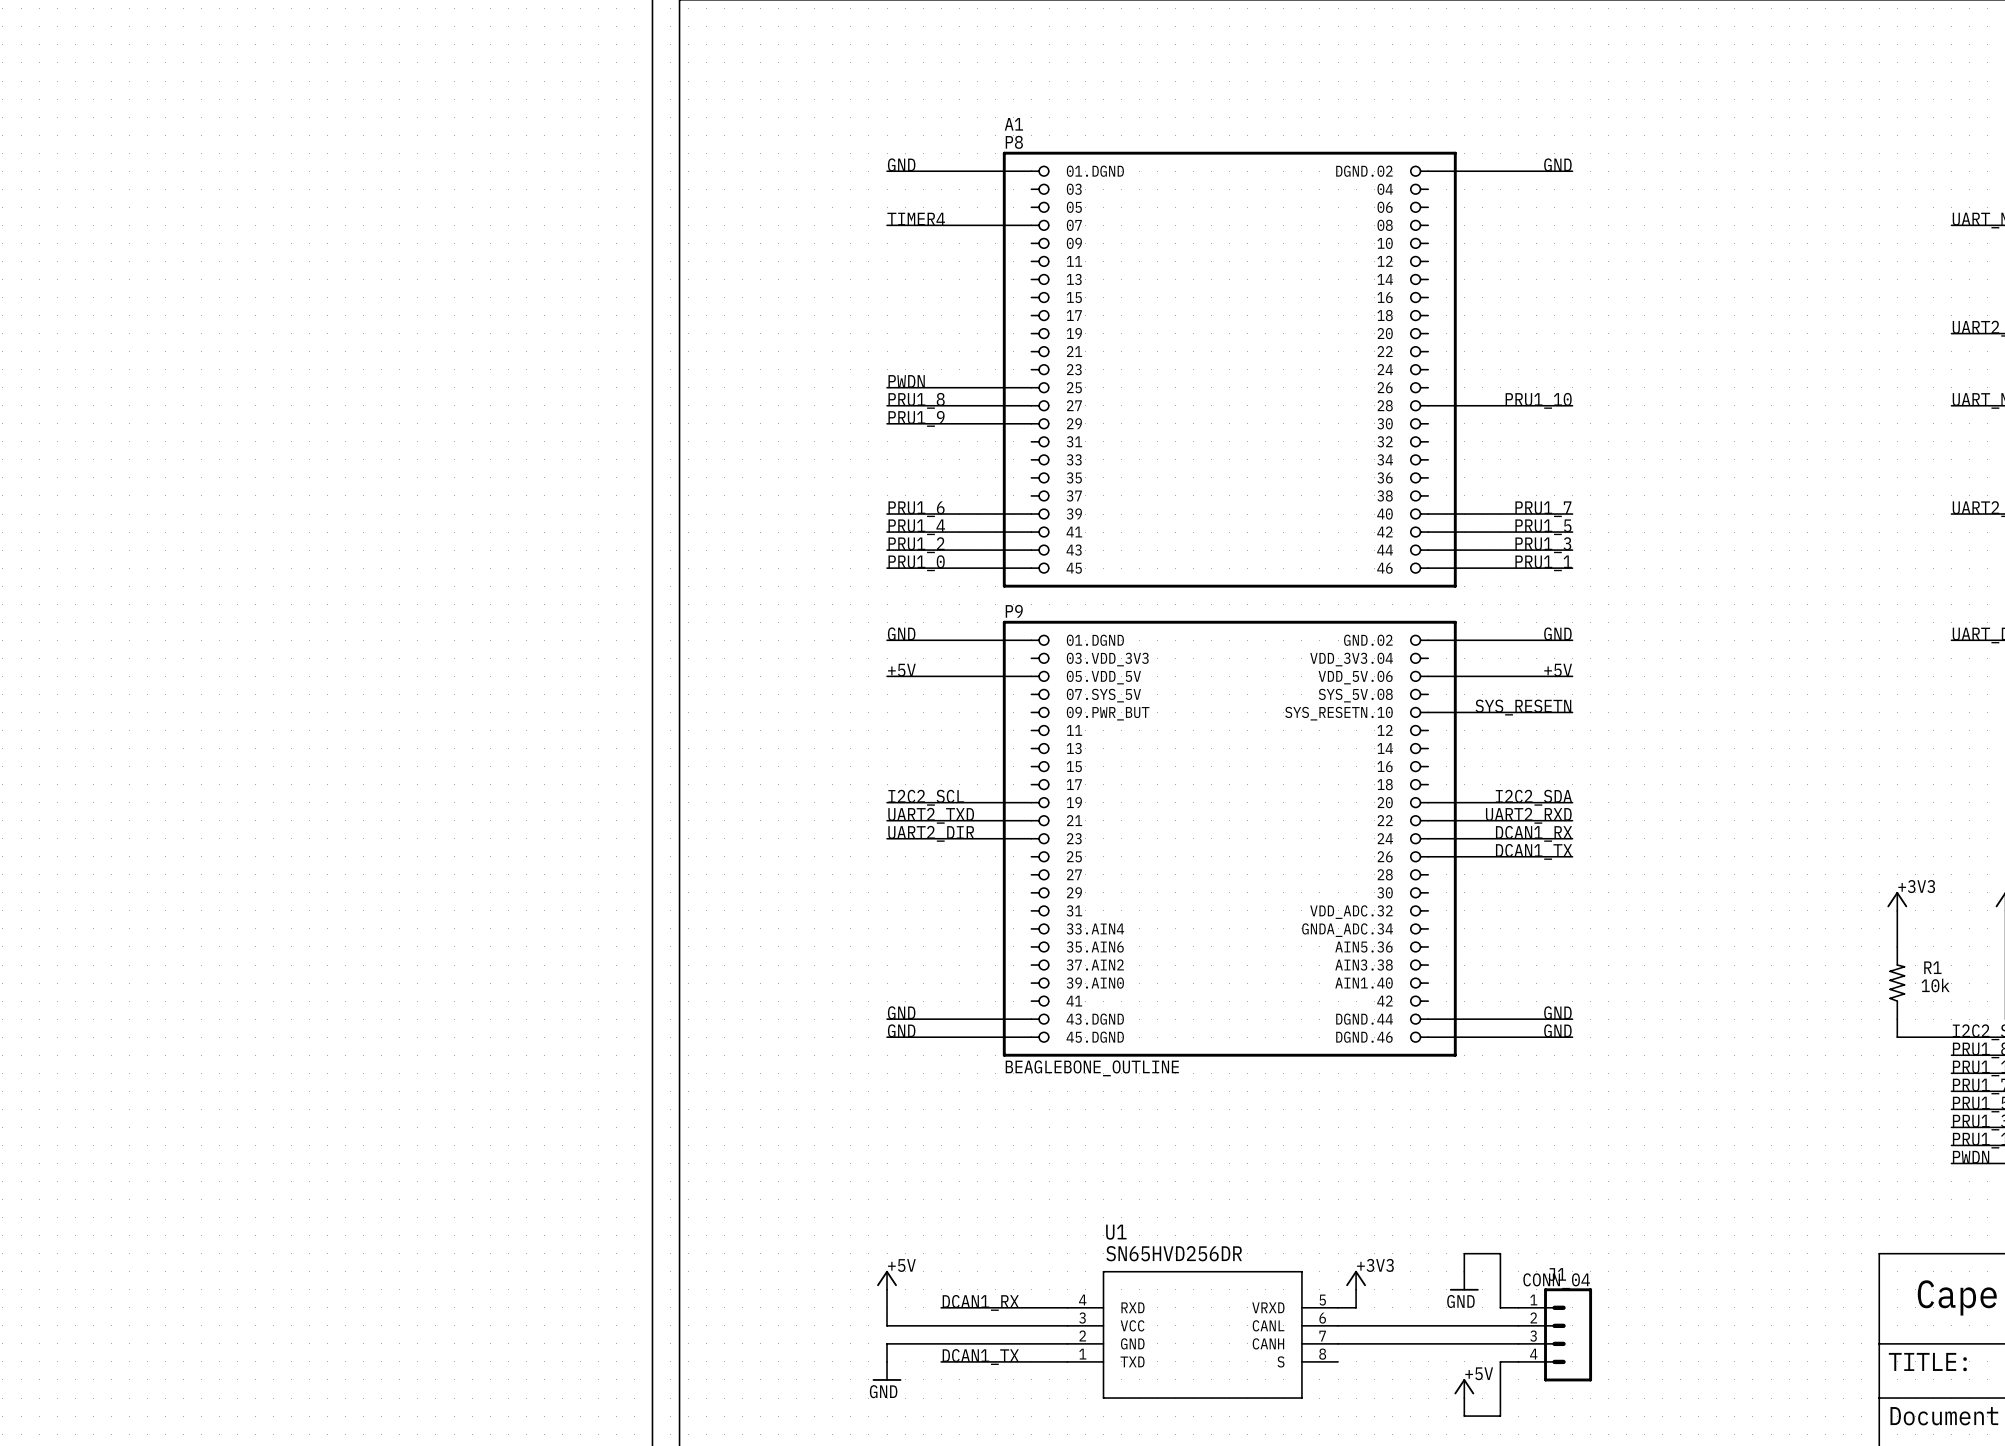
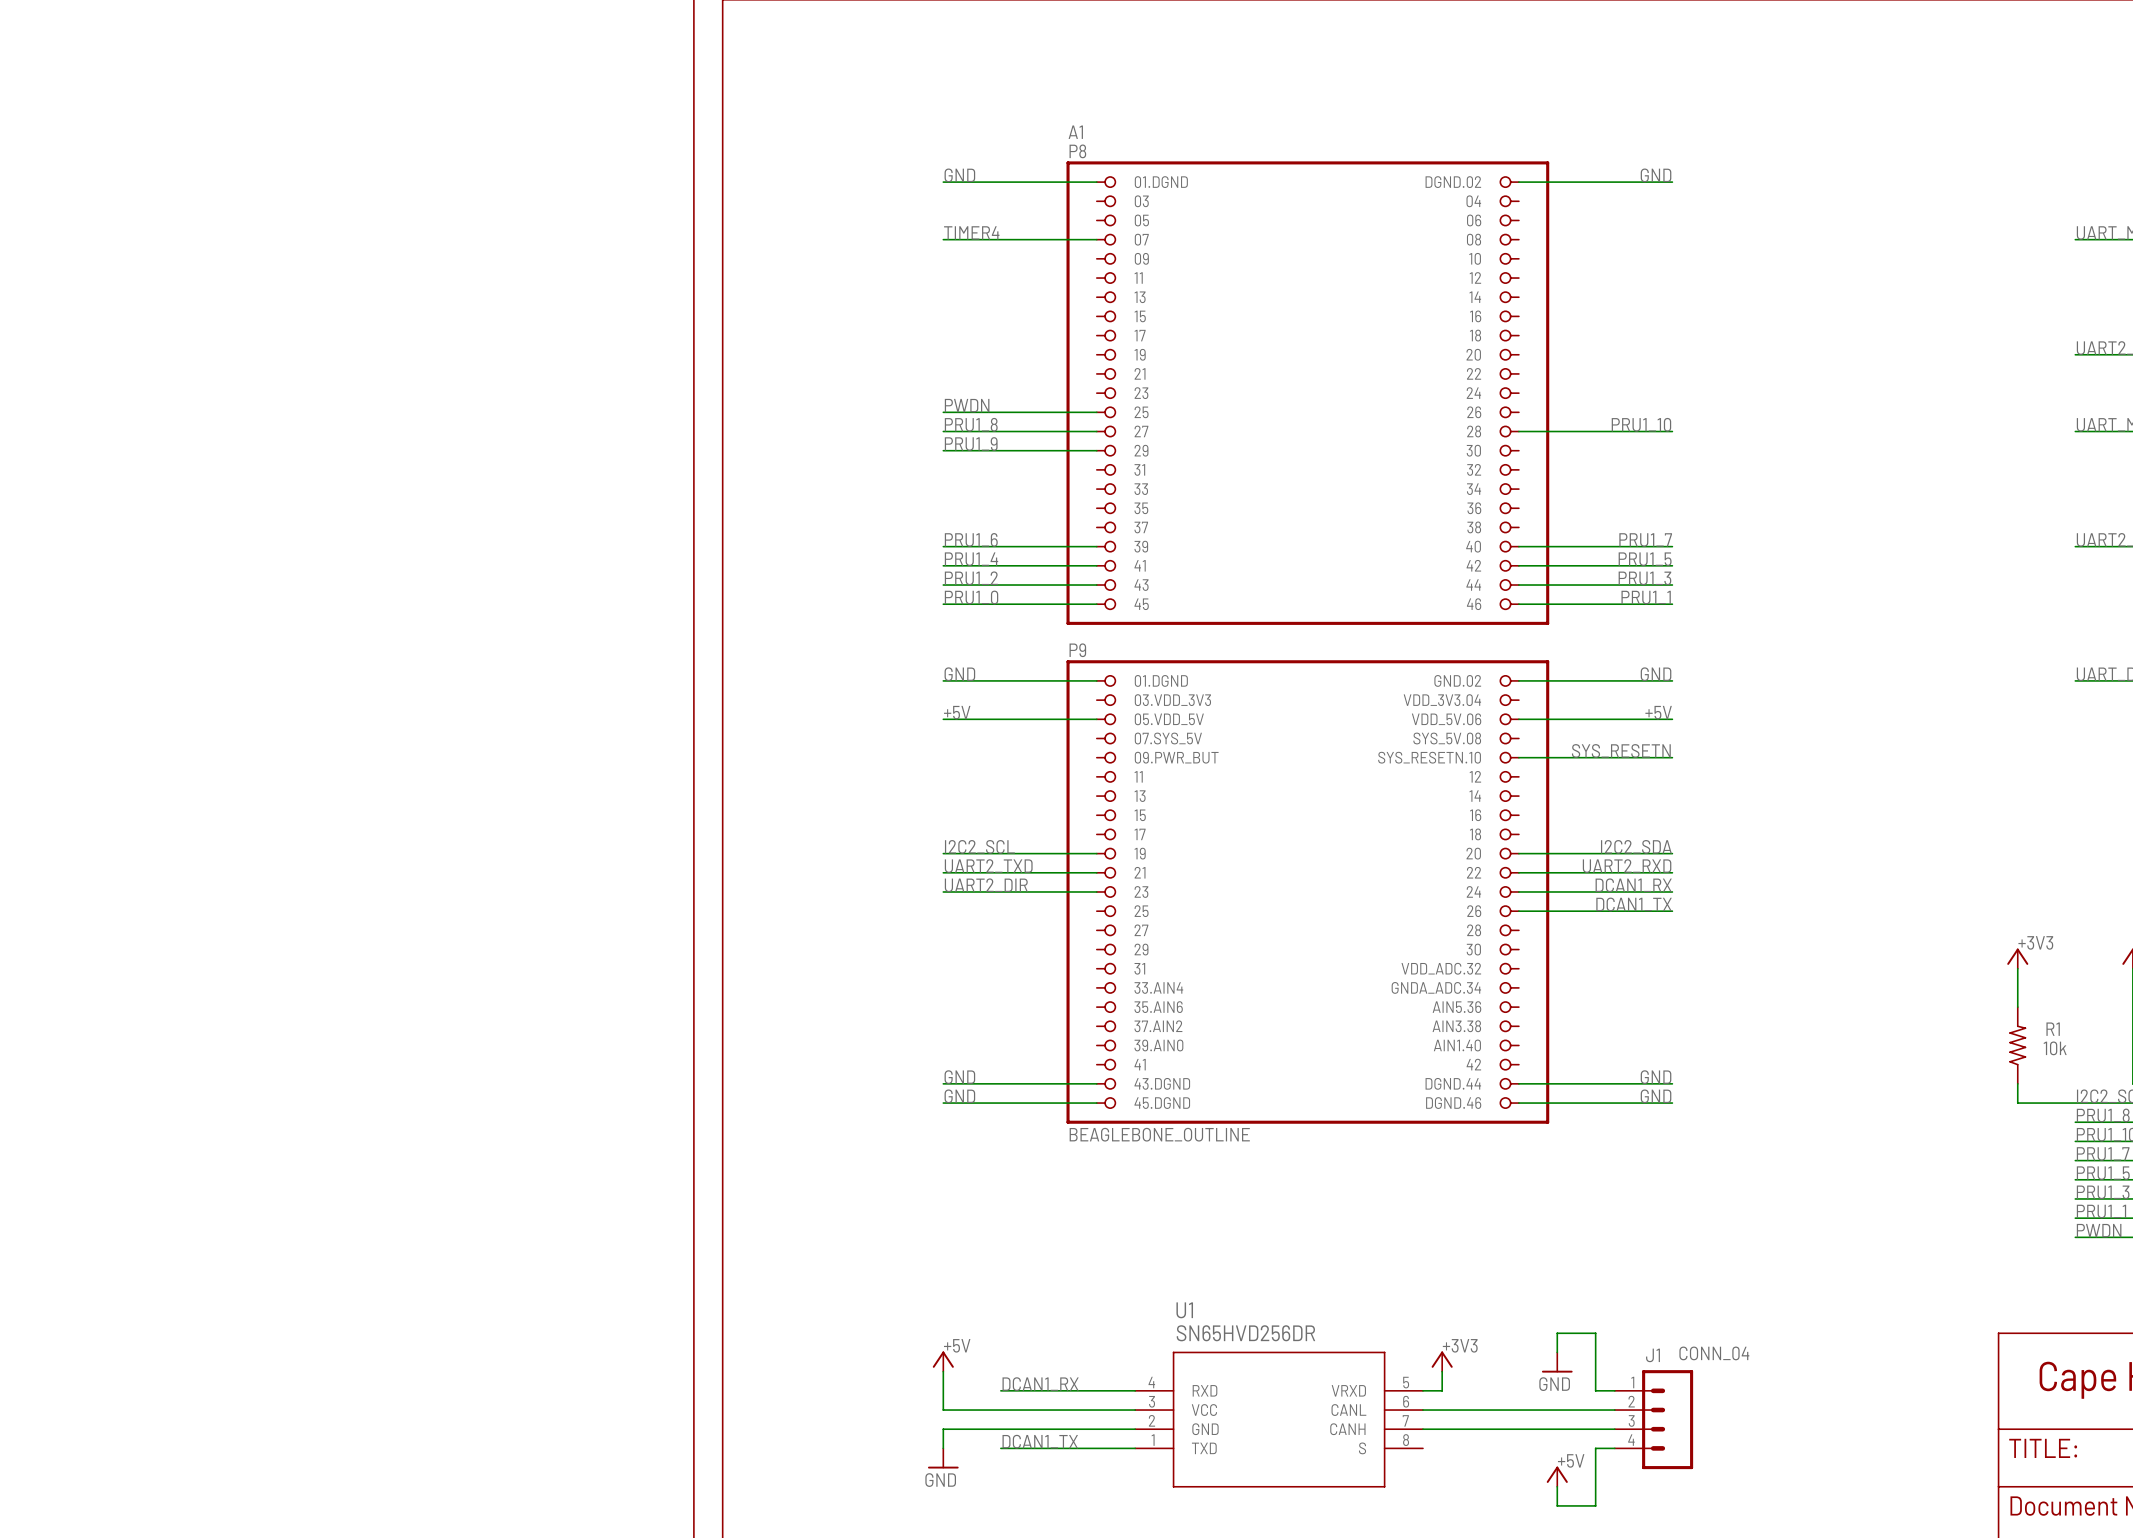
J1 value position: CONN_04 (1556, 1281) -> CONN_04 (1714, 1353)

